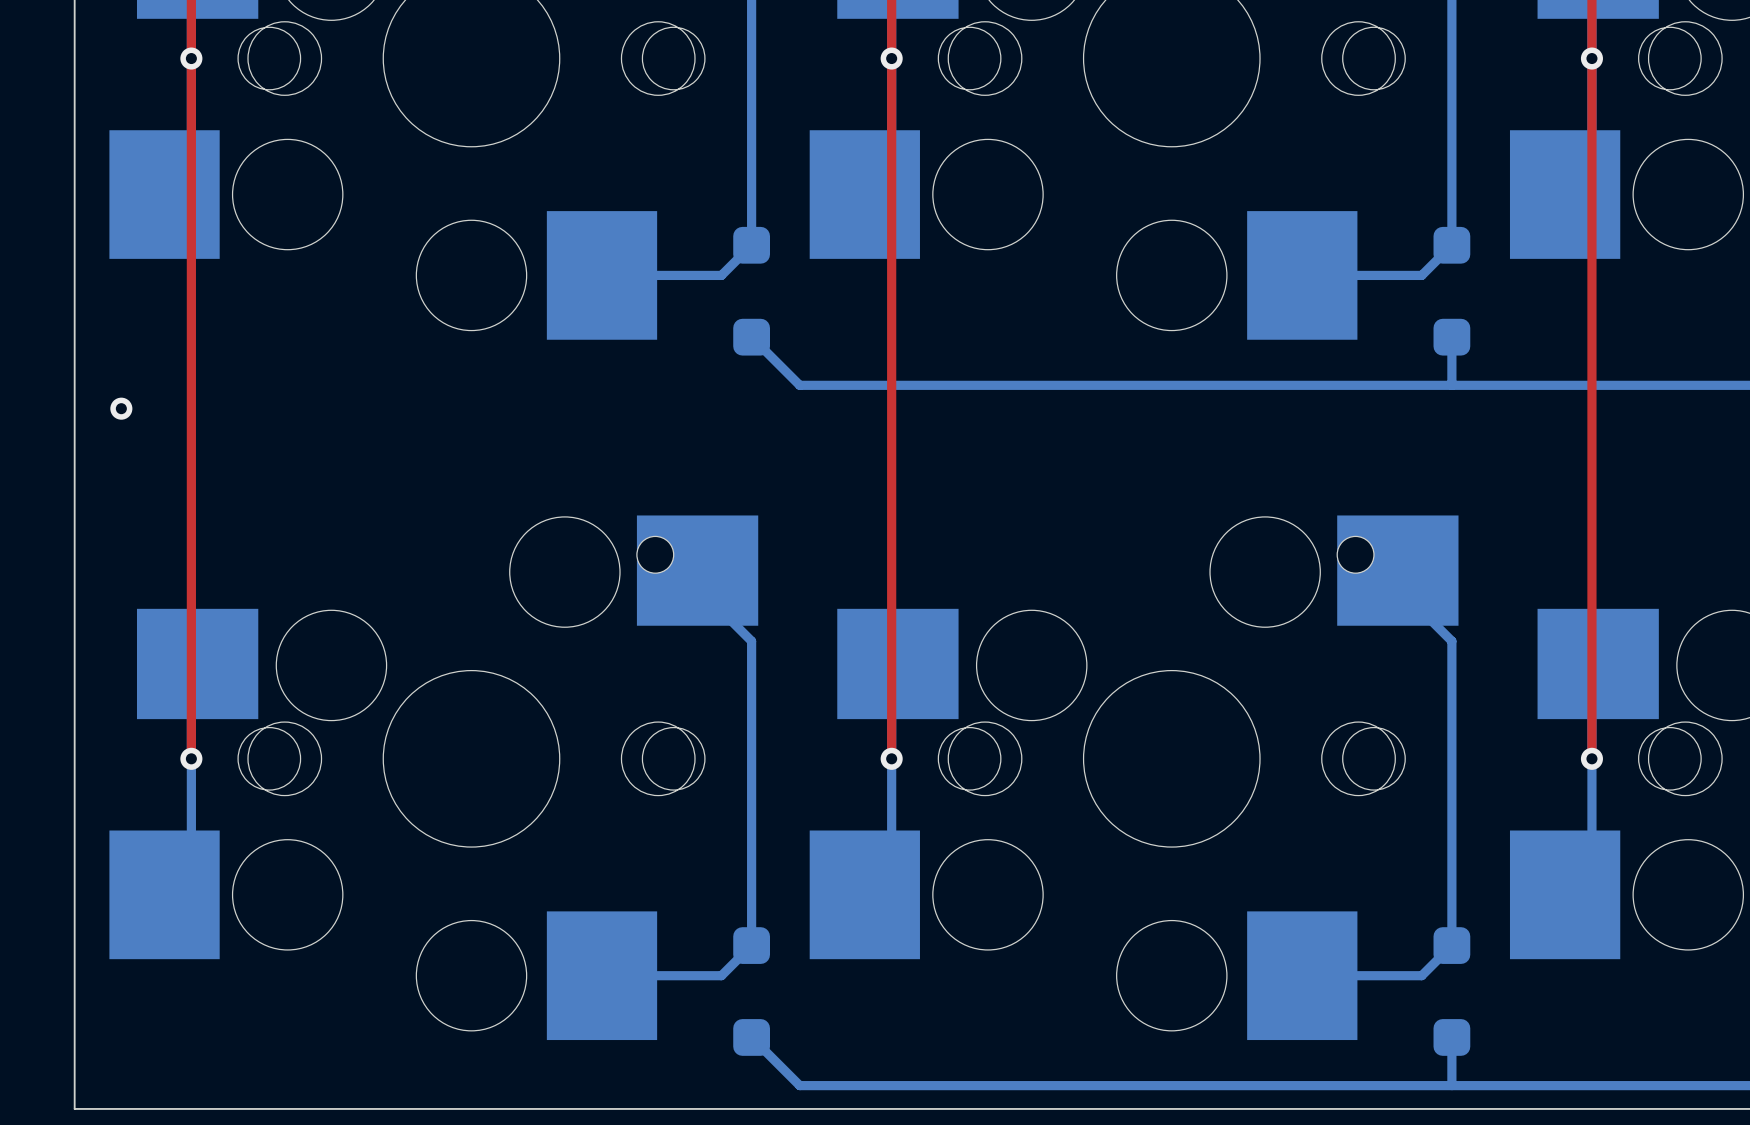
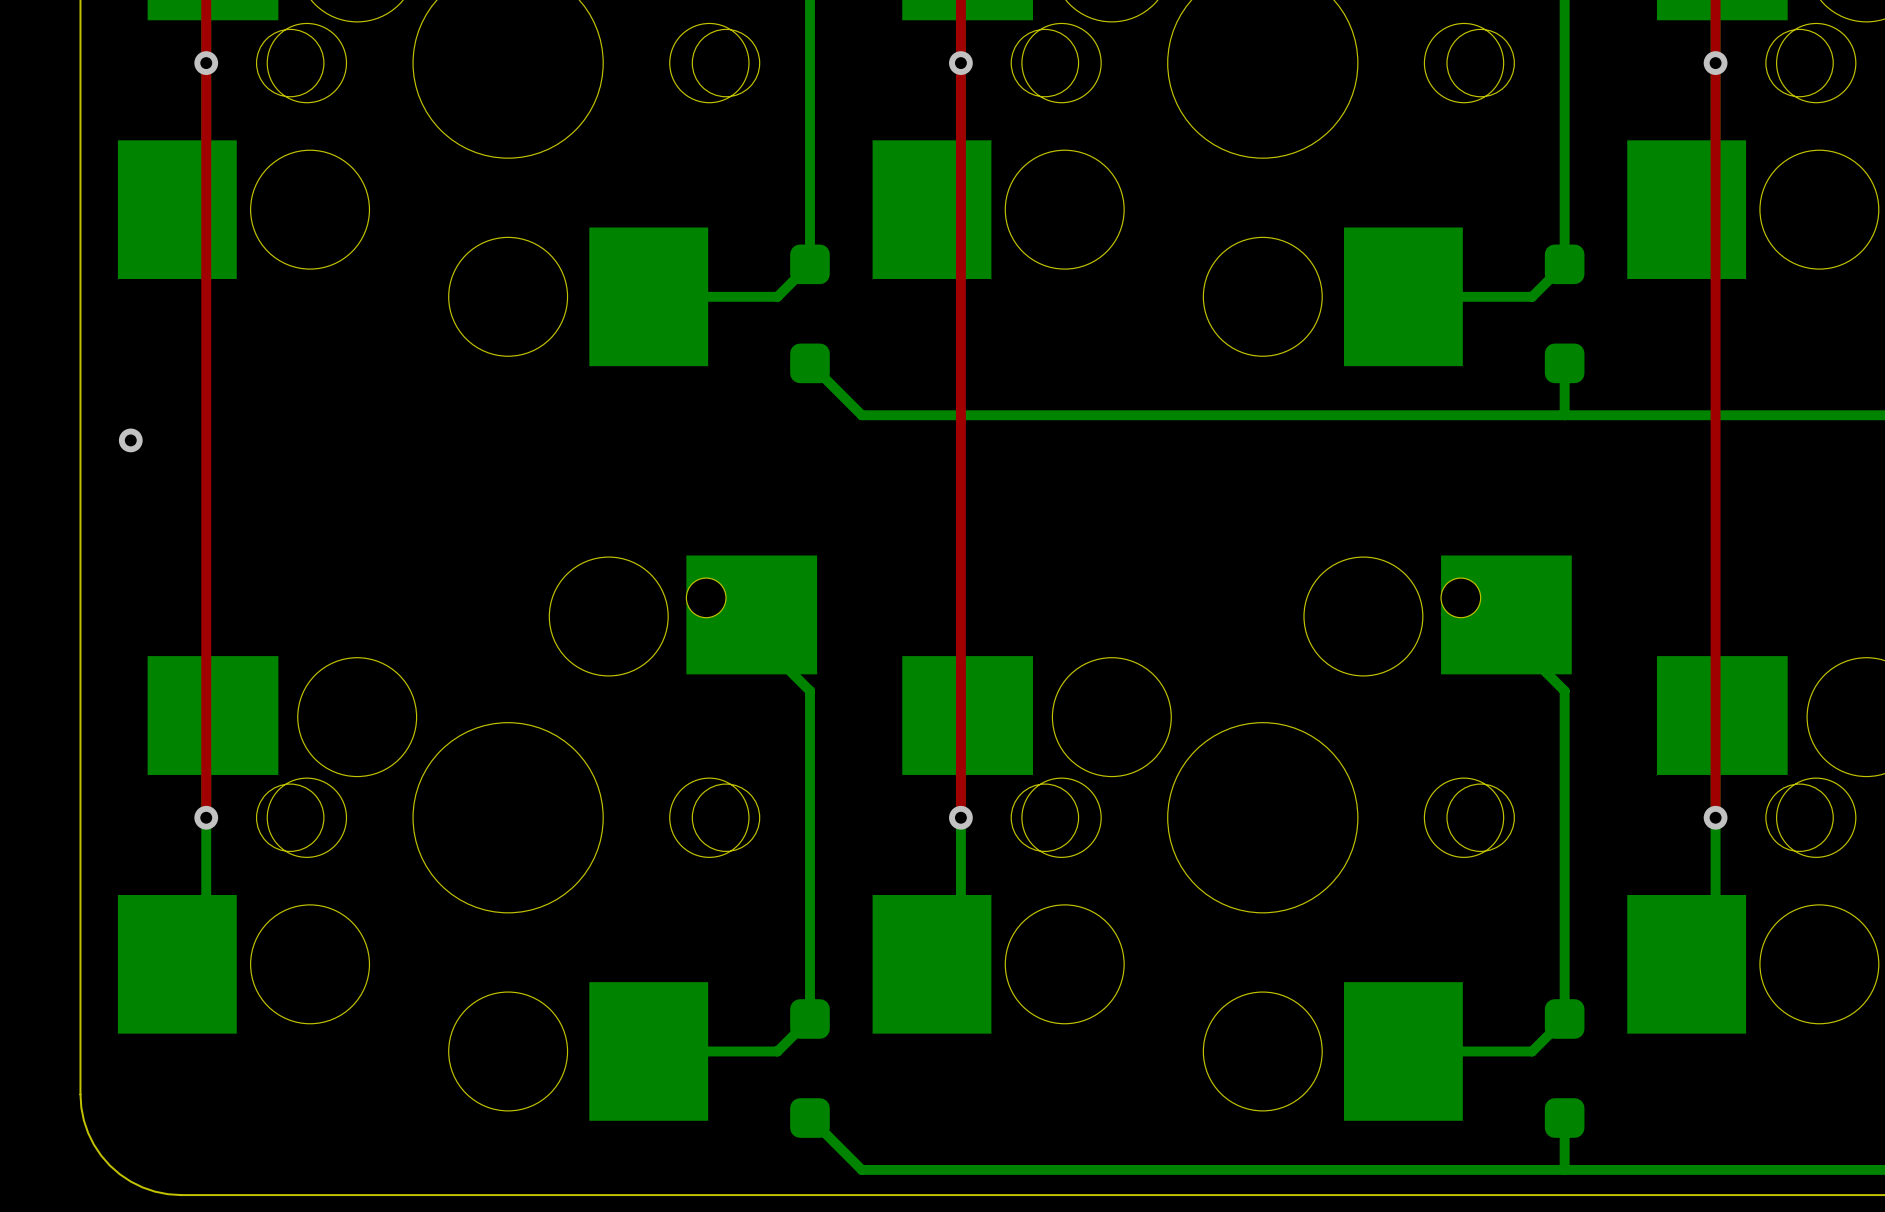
board edge: (74, 1015) (74, 1108) (168, 1108) -> (80, 1094) (81, 1107) (88, 1132) (93, 1144) (109, 1165) (119, 1174) (142, 1187) (167, 1194) (181, 1195)

